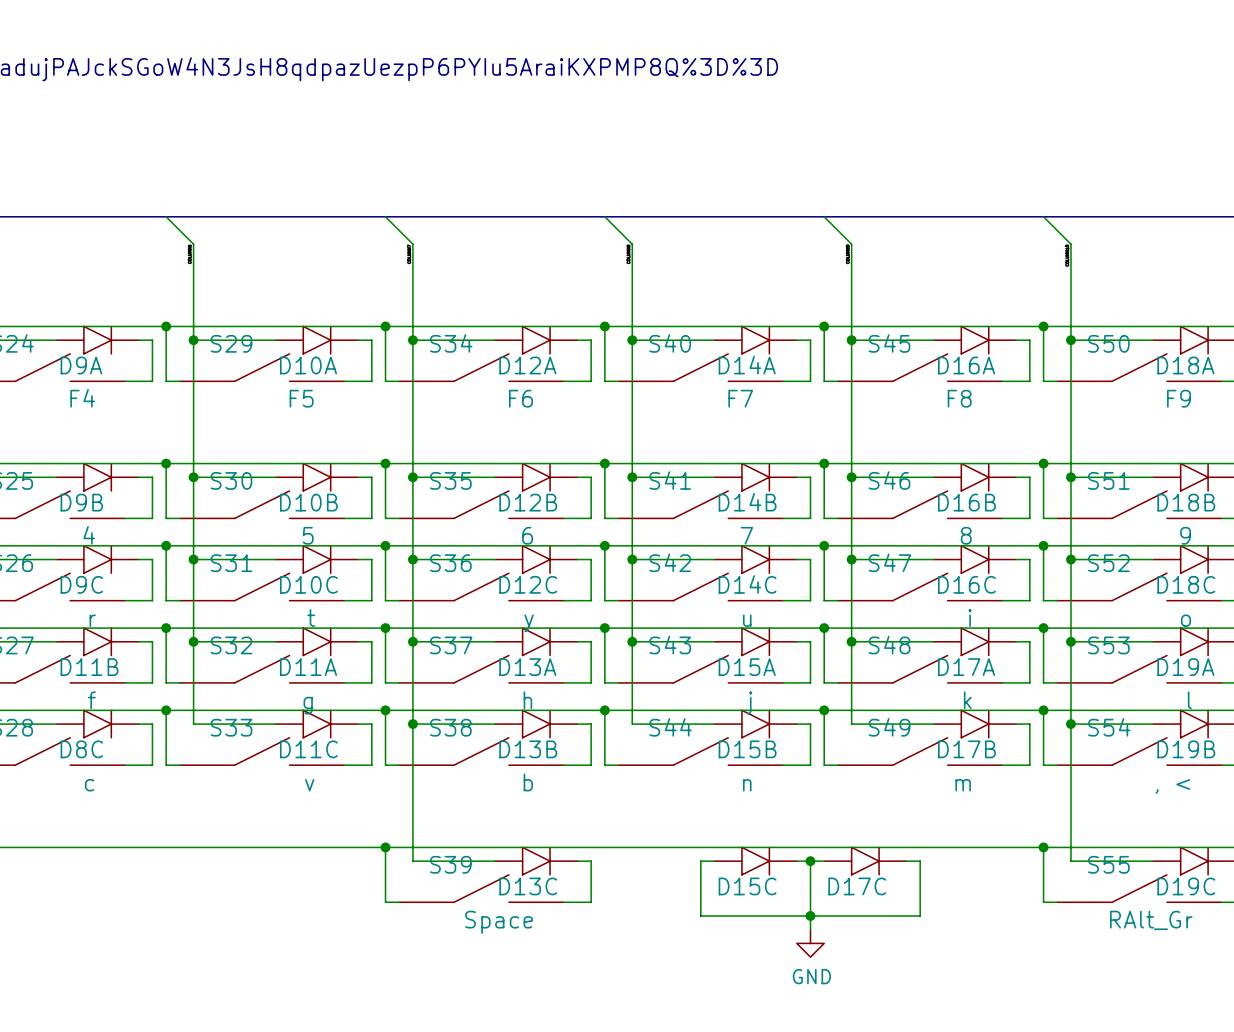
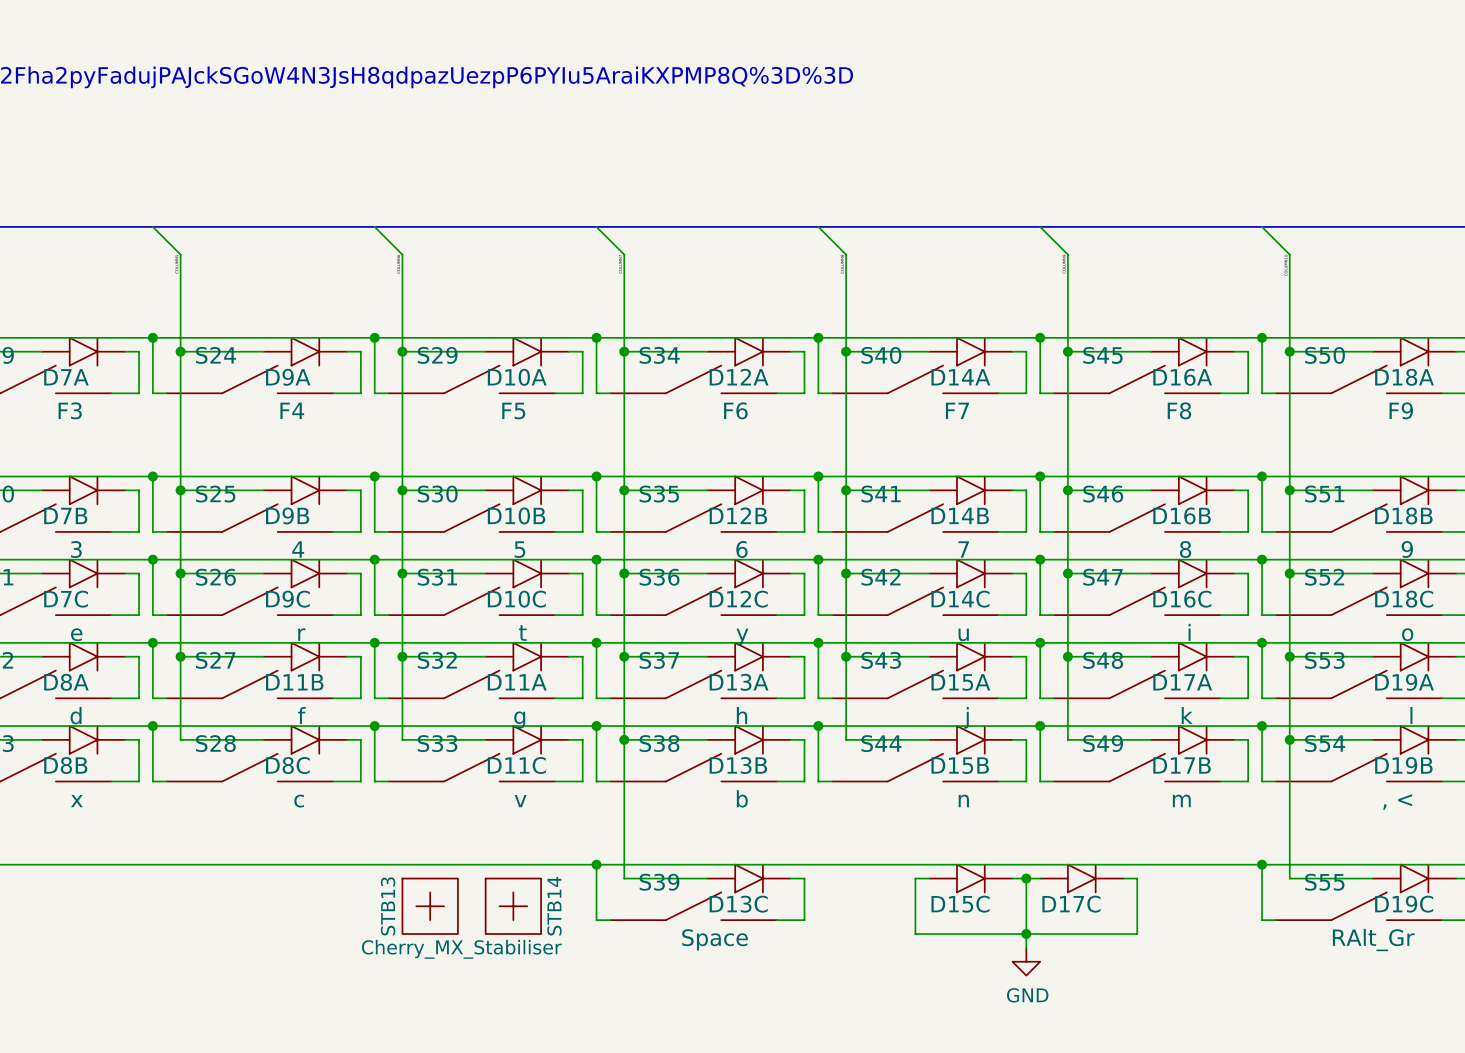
STB13: none -> Cherry_MX_Stabiliser (430, 906)
STB14: none -> (513, 906)

